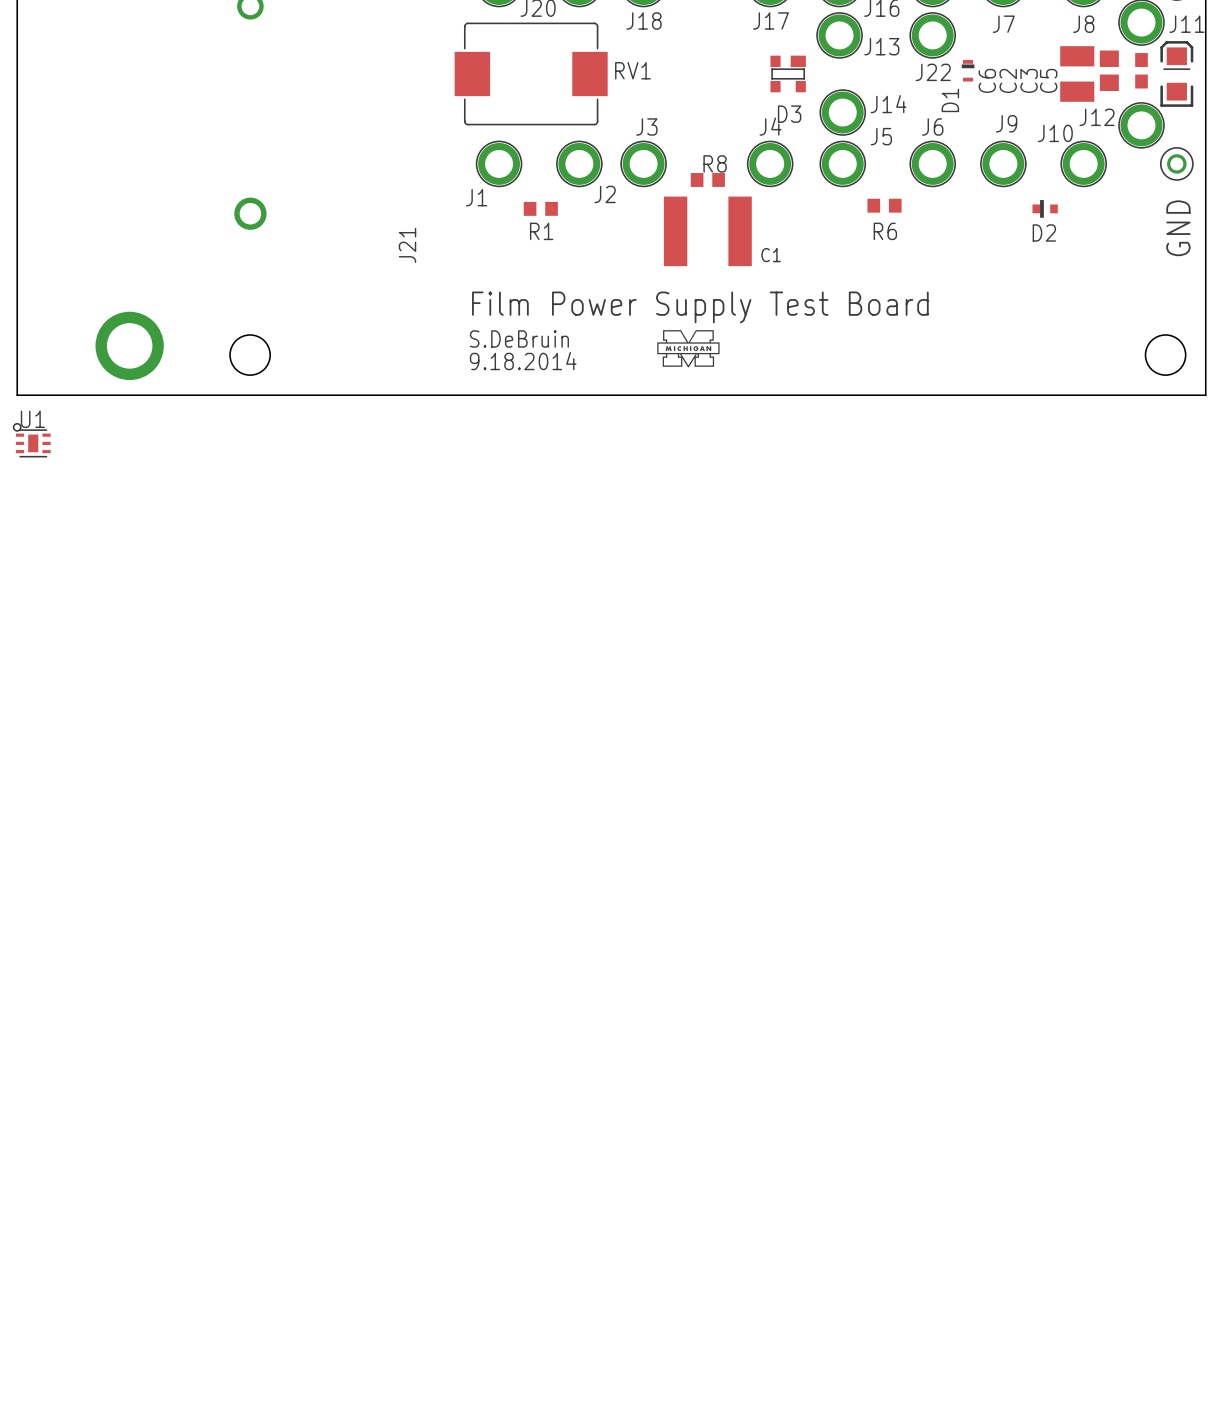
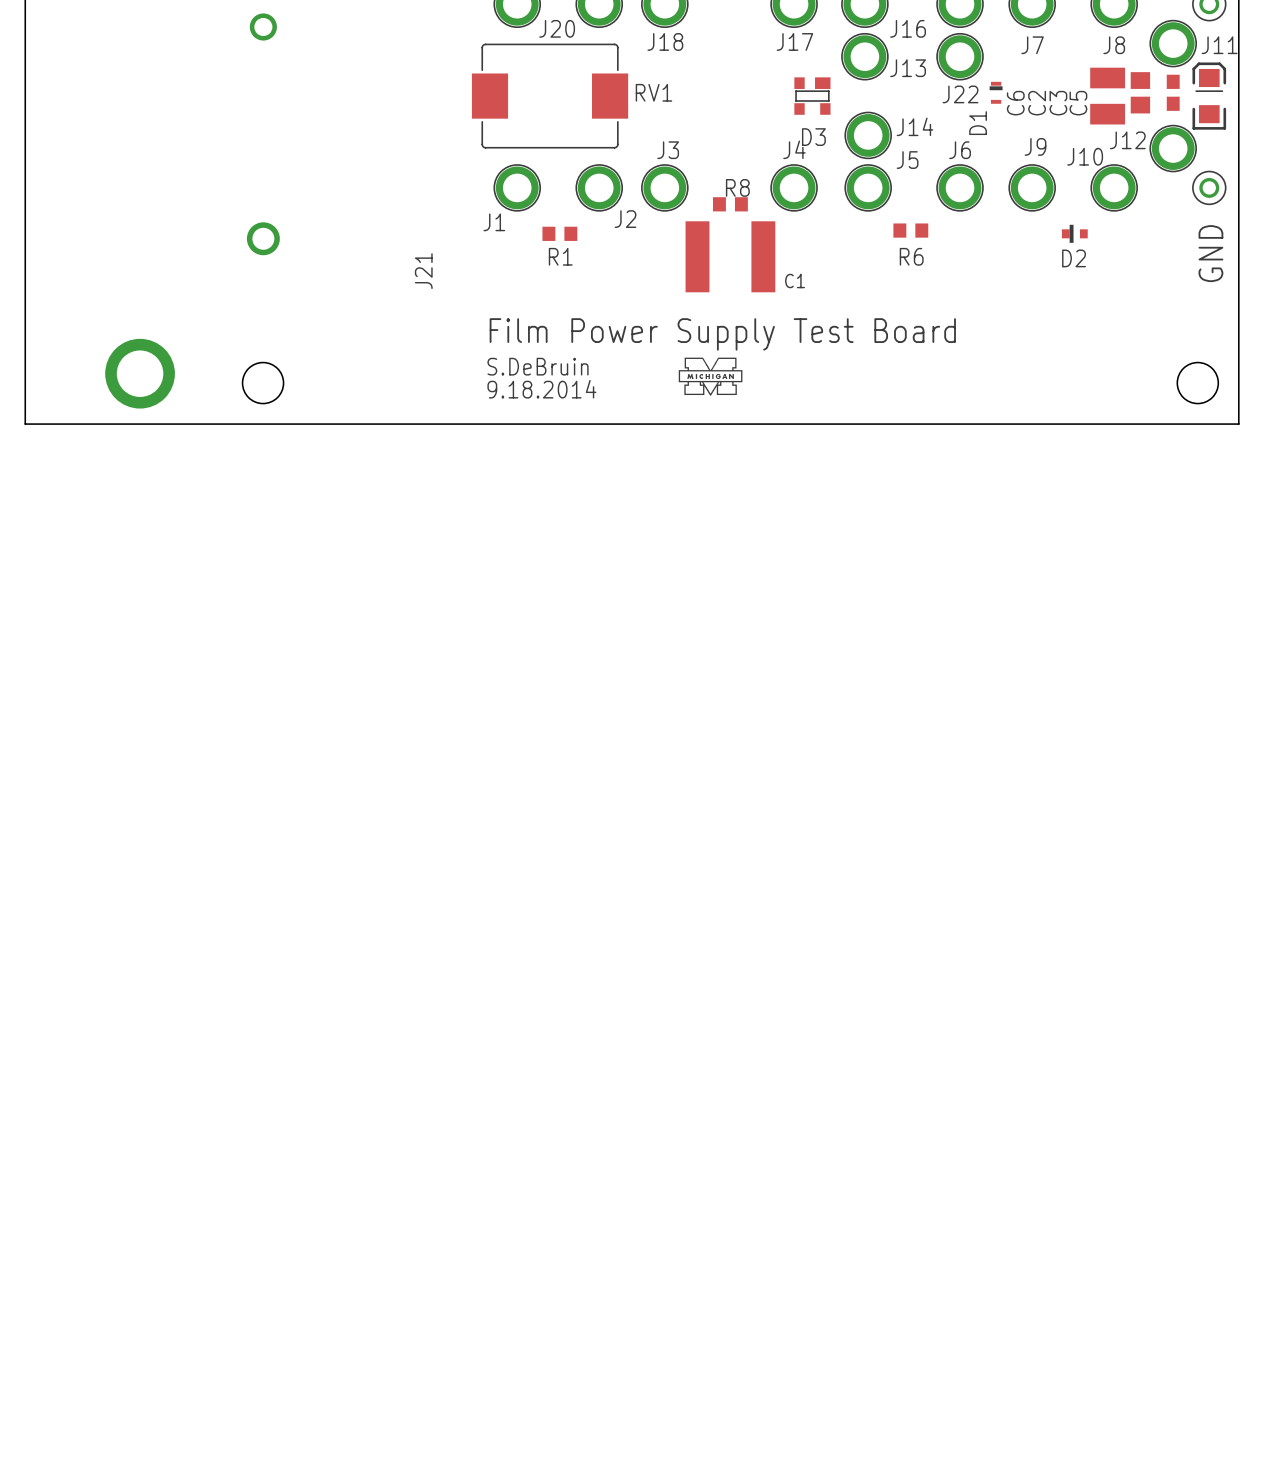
U1: (31, 440) -> none

